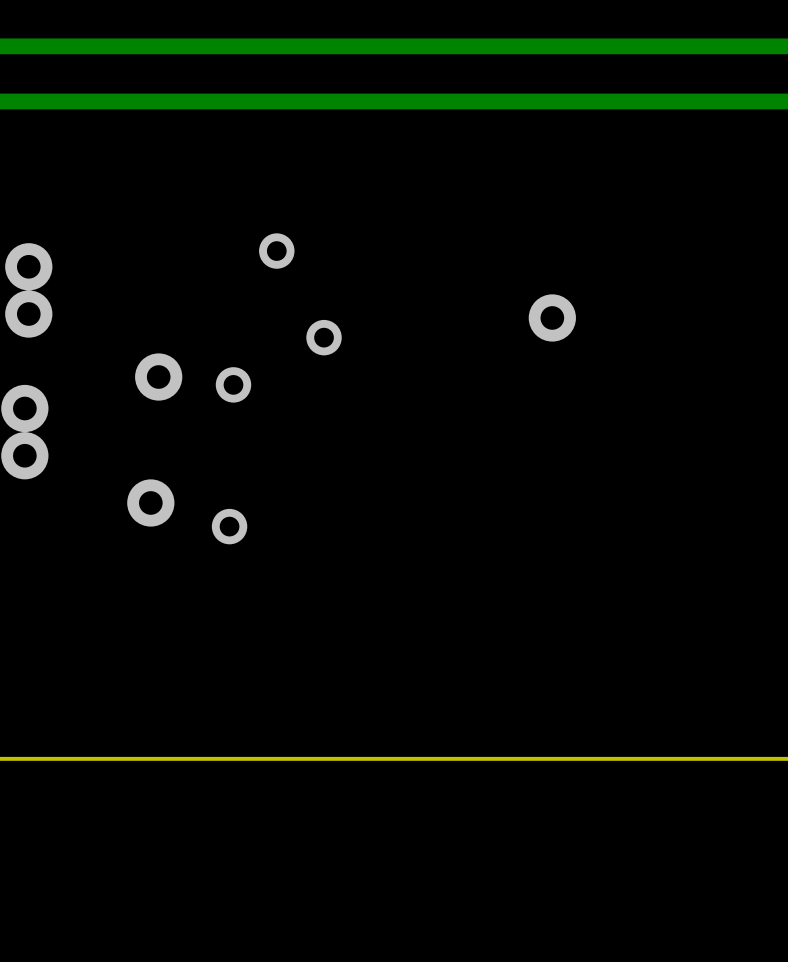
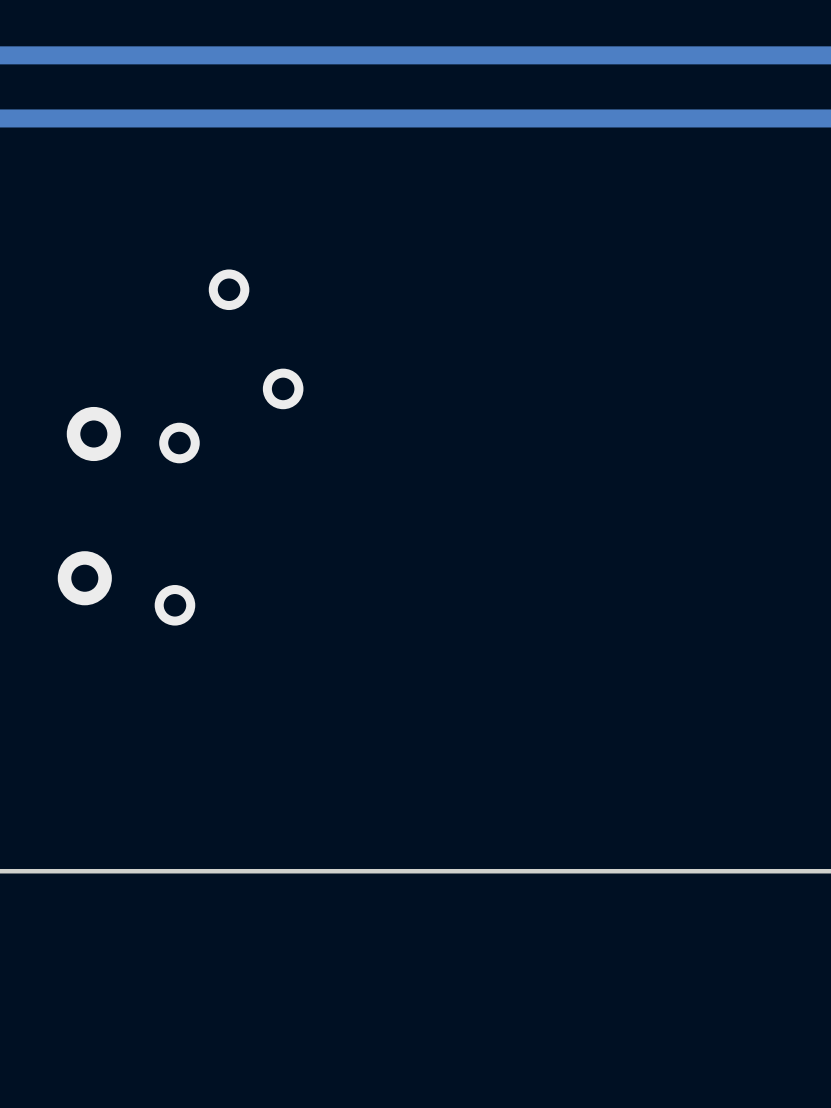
via: (552, 317) -> none

